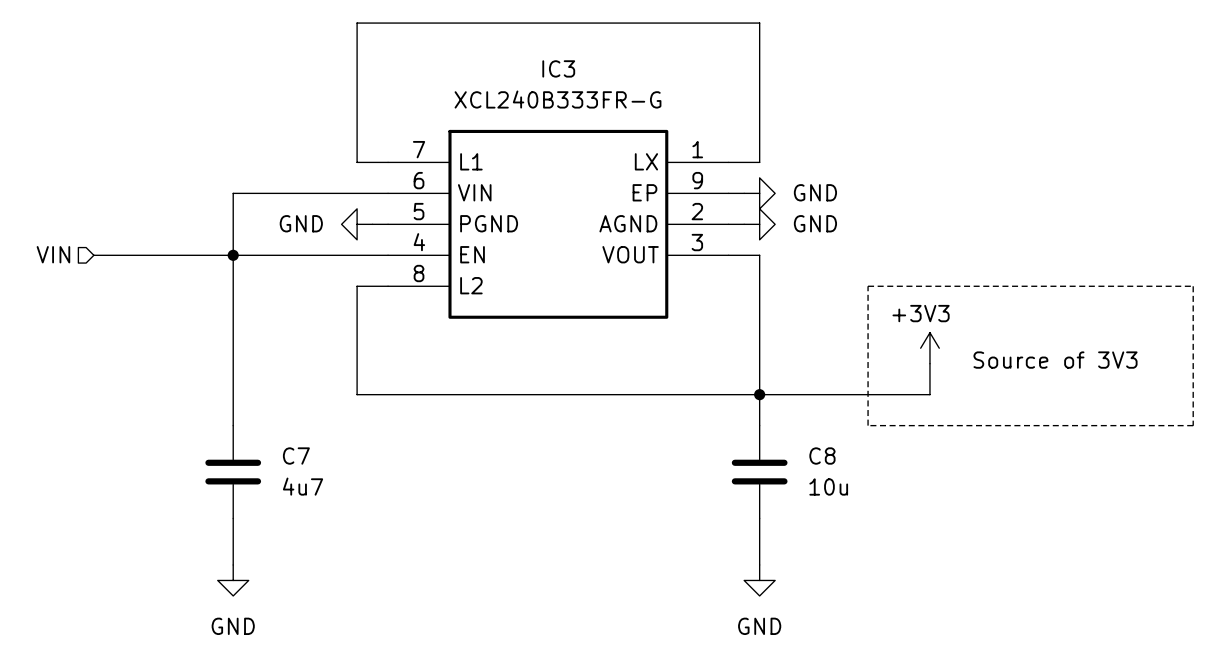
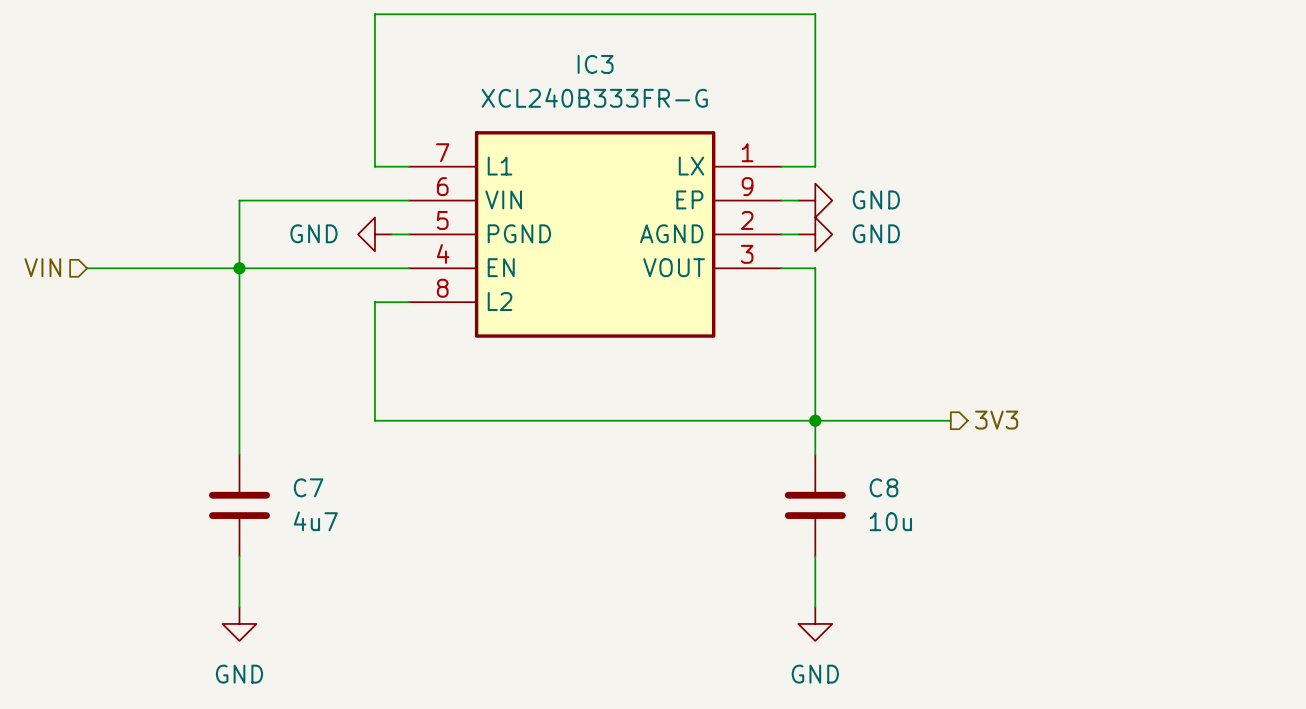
line: (868, 286) (1193, 286) (1193, 425) (868, 425) (868, 286) -> none
power symbol: +3V3 (929, 348) -> none
text: Source of 3V3 (1055, 360) -> none
wire: (929, 363) (929, 394) (883, 394) -> none
hierarchical label: none -> 3V3 (996, 420)

